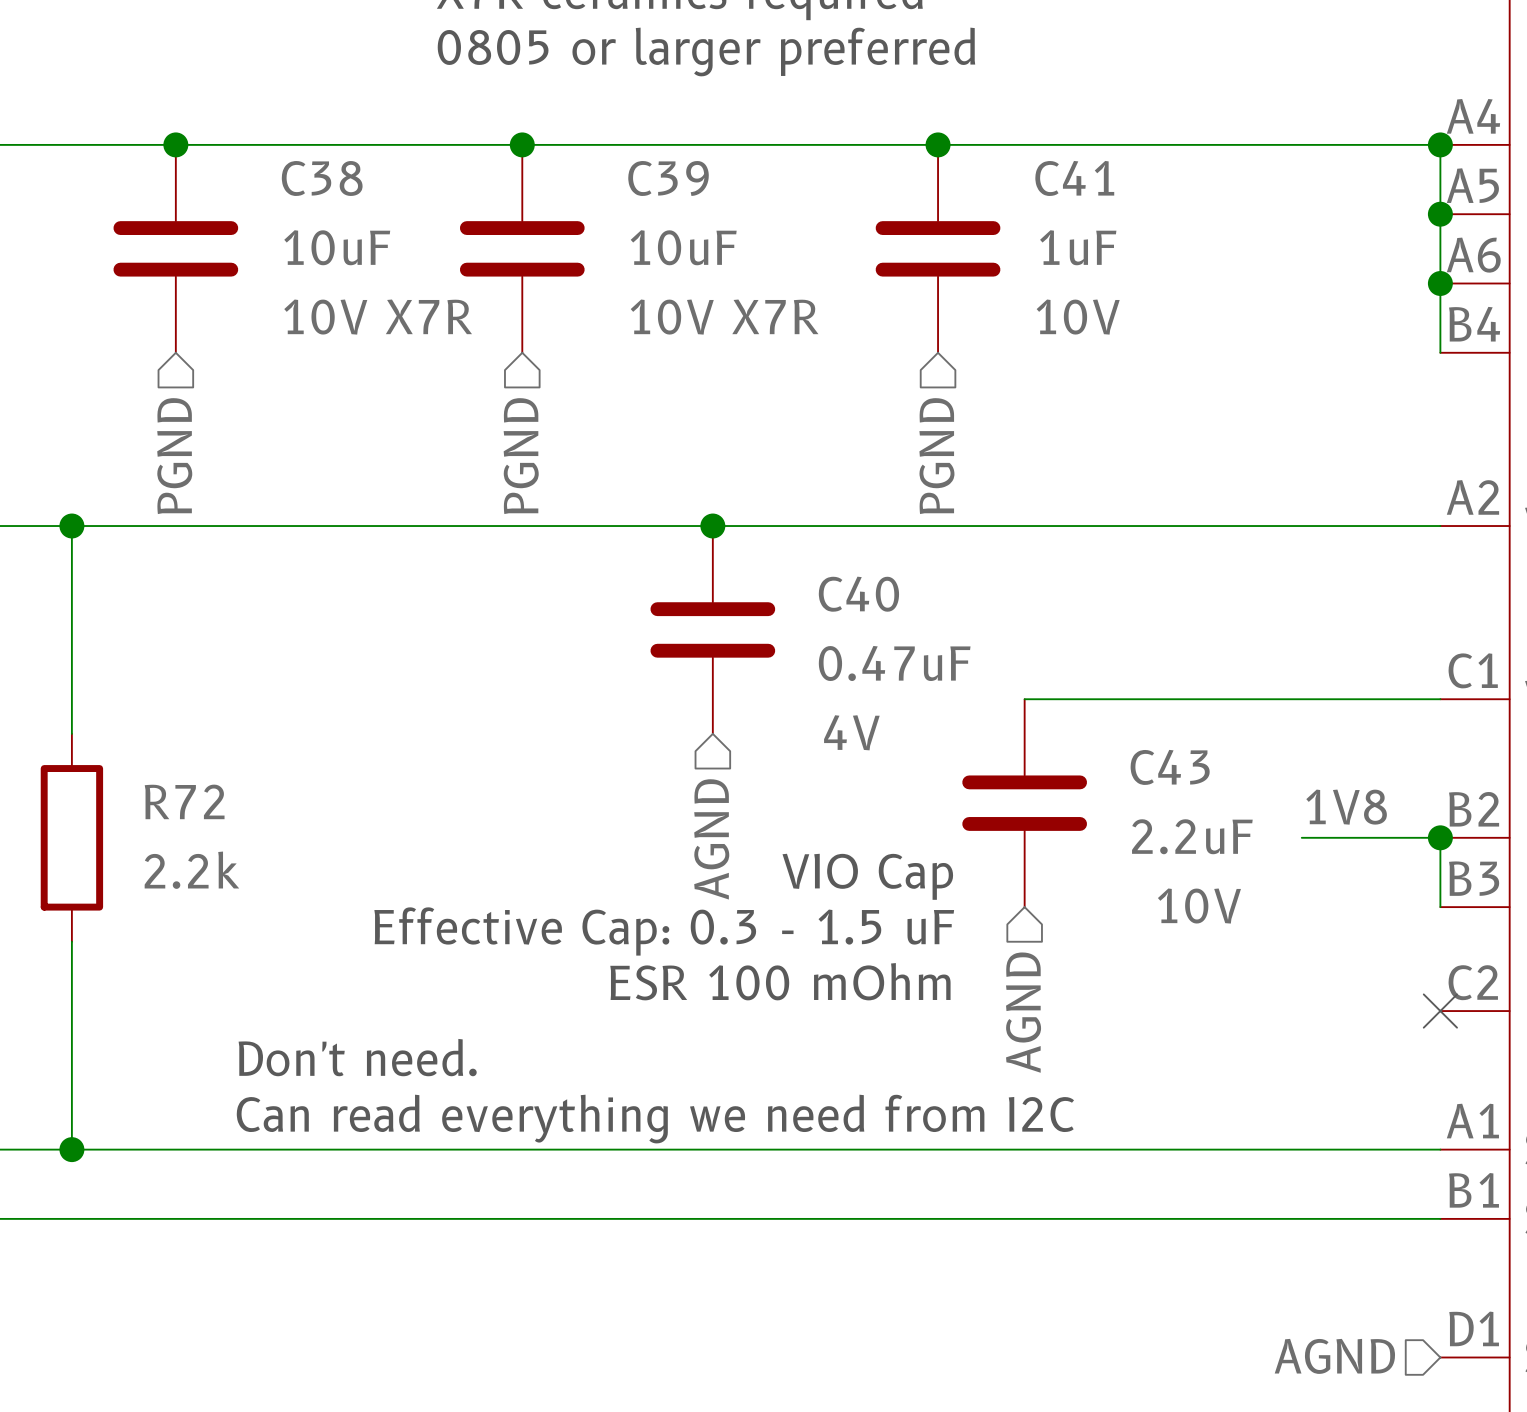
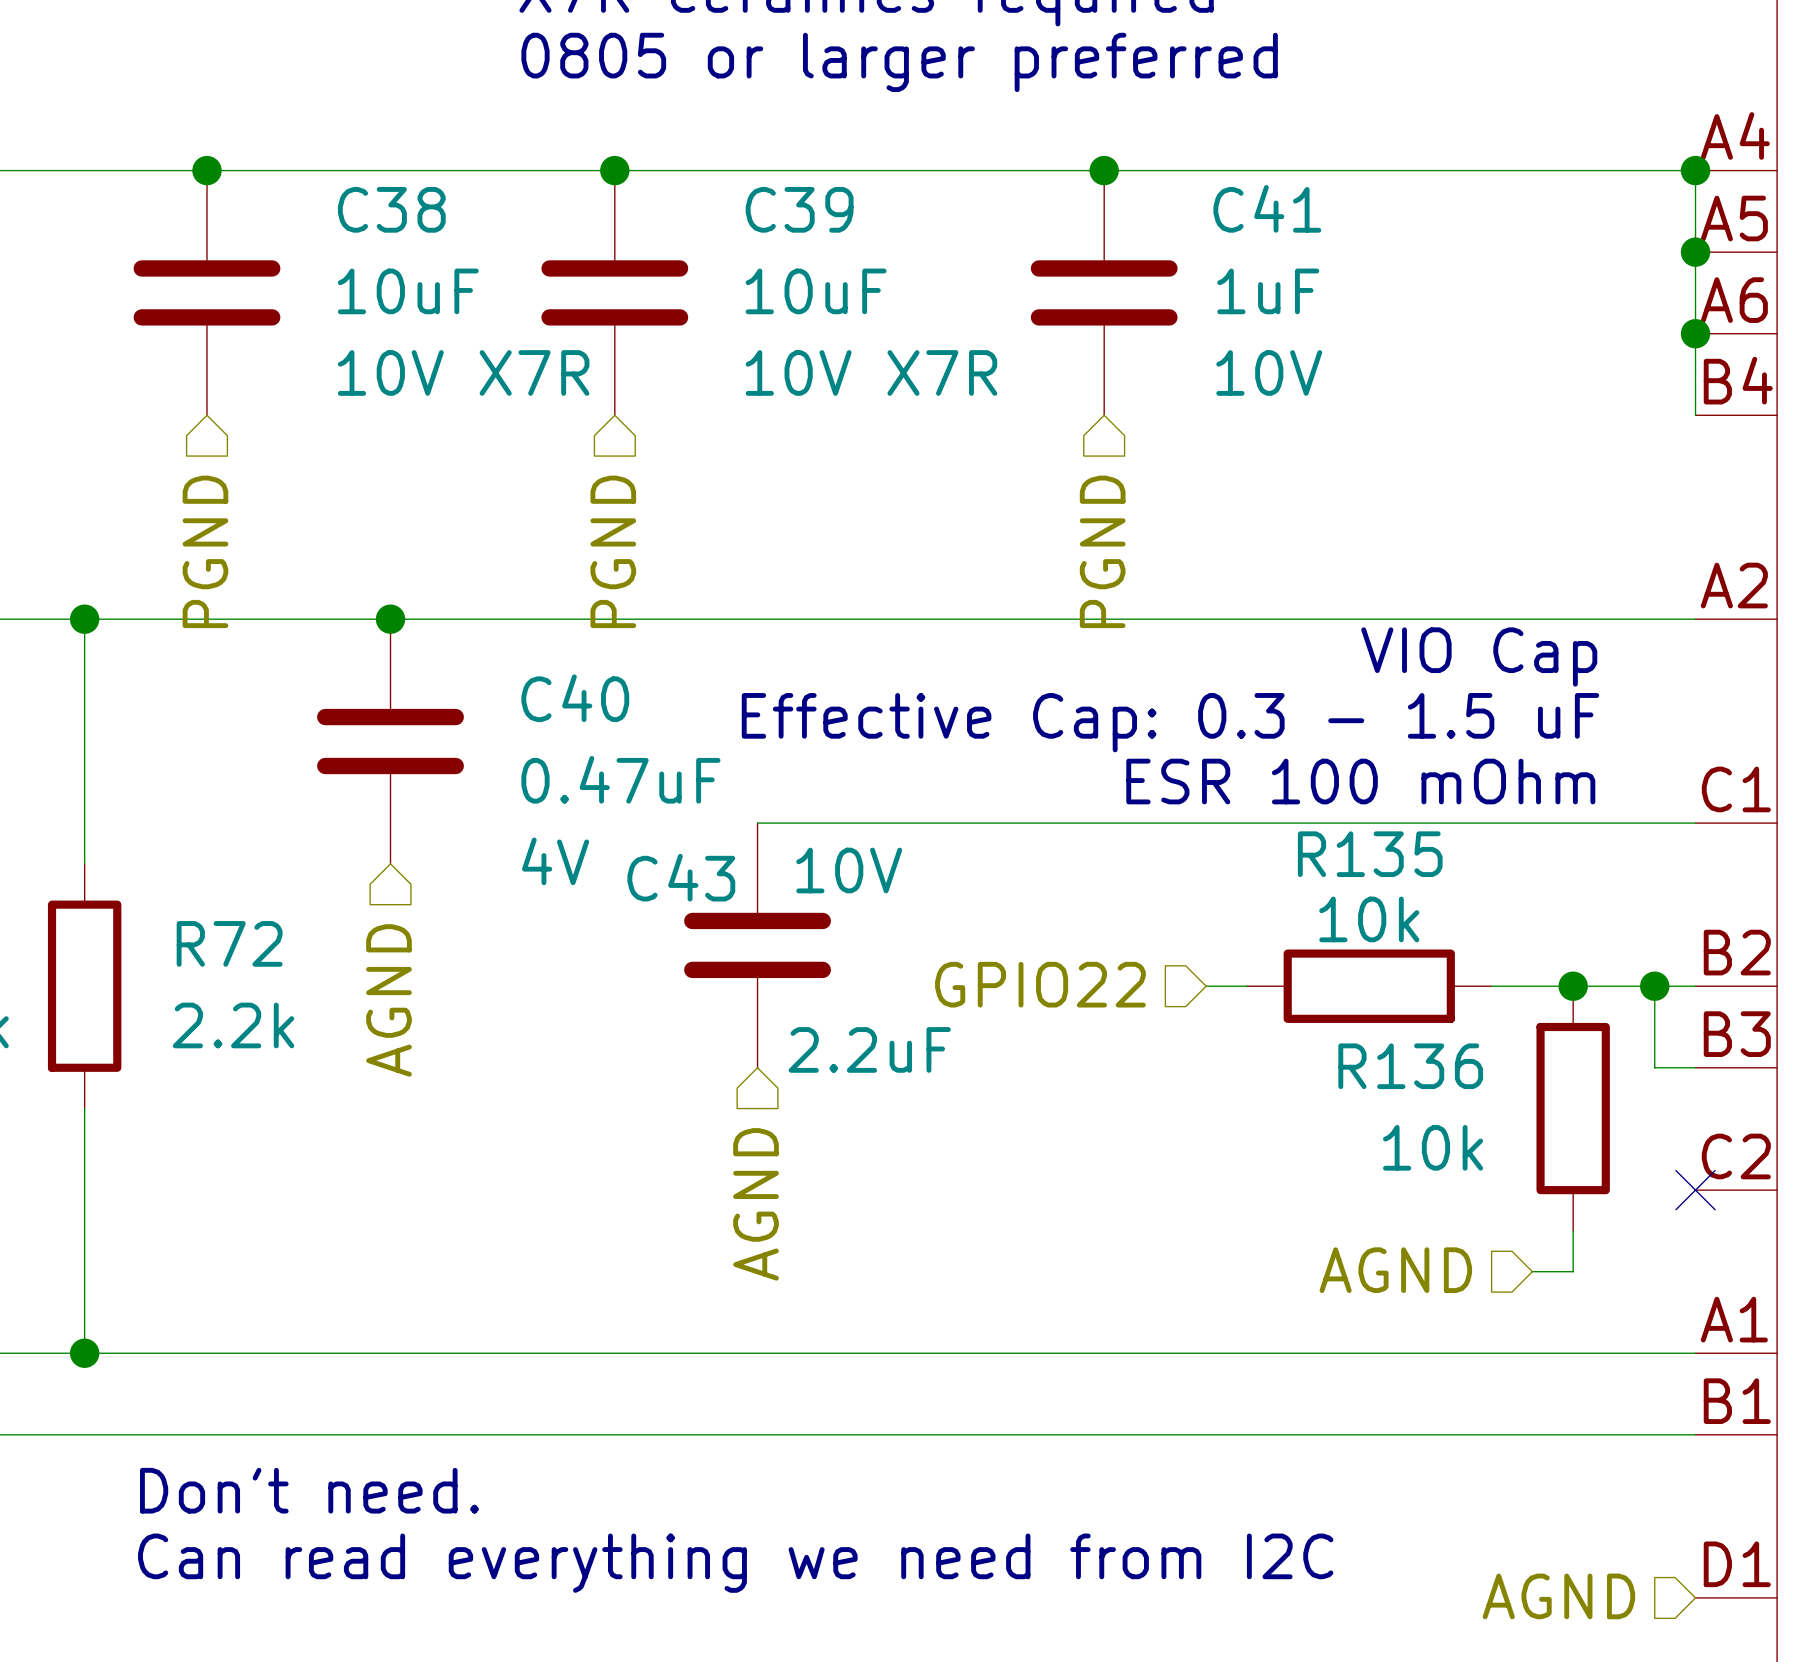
junction: none -> (390, 619)
junction: (712, 526) -> none
C40 position: (712, 629) -> (390, 741)
wire: none -> (757, 823) (1206, 823)
C43 name position: C43 (1170, 767) -> C43 (681, 877)
C43 position: (1024, 803) -> (757, 945)
label: 1V8 (1346, 807) -> none
hierarchical label: none -> GPIO22 (1040, 984)
C43 value position: 2.2uF (1192, 836) -> 2.2uF (869, 1049)
wire: none -> (1206, 986) (1246, 986)
R135: none -> 10k (1369, 986)
wire: none -> (1491, 986) (1532, 986)
junction: none -> (1573, 986)
wire: (1440, 837) (1440, 907) -> (1654, 986) (1654, 1067) (1695, 1067)
junction position: (1440, 837) -> (1654, 986)
hierarchical label: none -> AGND (388, 1000)
hierarchical label position: AGND (711, 839) -> AGND (756, 1204)
text position: VIO Cap (867, 876) -> VIO Cap (1479, 657)
C43 text position: 10V (1199, 906) -> 10V (849, 870)
text position: Effective Cap: 0.3 - 1.5 uF (664, 931) -> Effective Cap: 0.3 - 1.5 uF (1170, 722)
R136: none -> 10k (1573, 1108)
text position: ESR 100 mOhm (780, 981) -> ESR 100 mOhm (1360, 781)
hierarchical label: AGND (1023, 1012) -> none
wire: none -> (1573, 1230) (1573, 1271) (1532, 1271)
text position: Don't need. (357, 1057) -> Don't need. (309, 1490)
hierarchical label: none -> AGND (1395, 1270)
text position: Can read everything we need from I2C (655, 1119) -> Can read everything we need from I2C (735, 1563)

